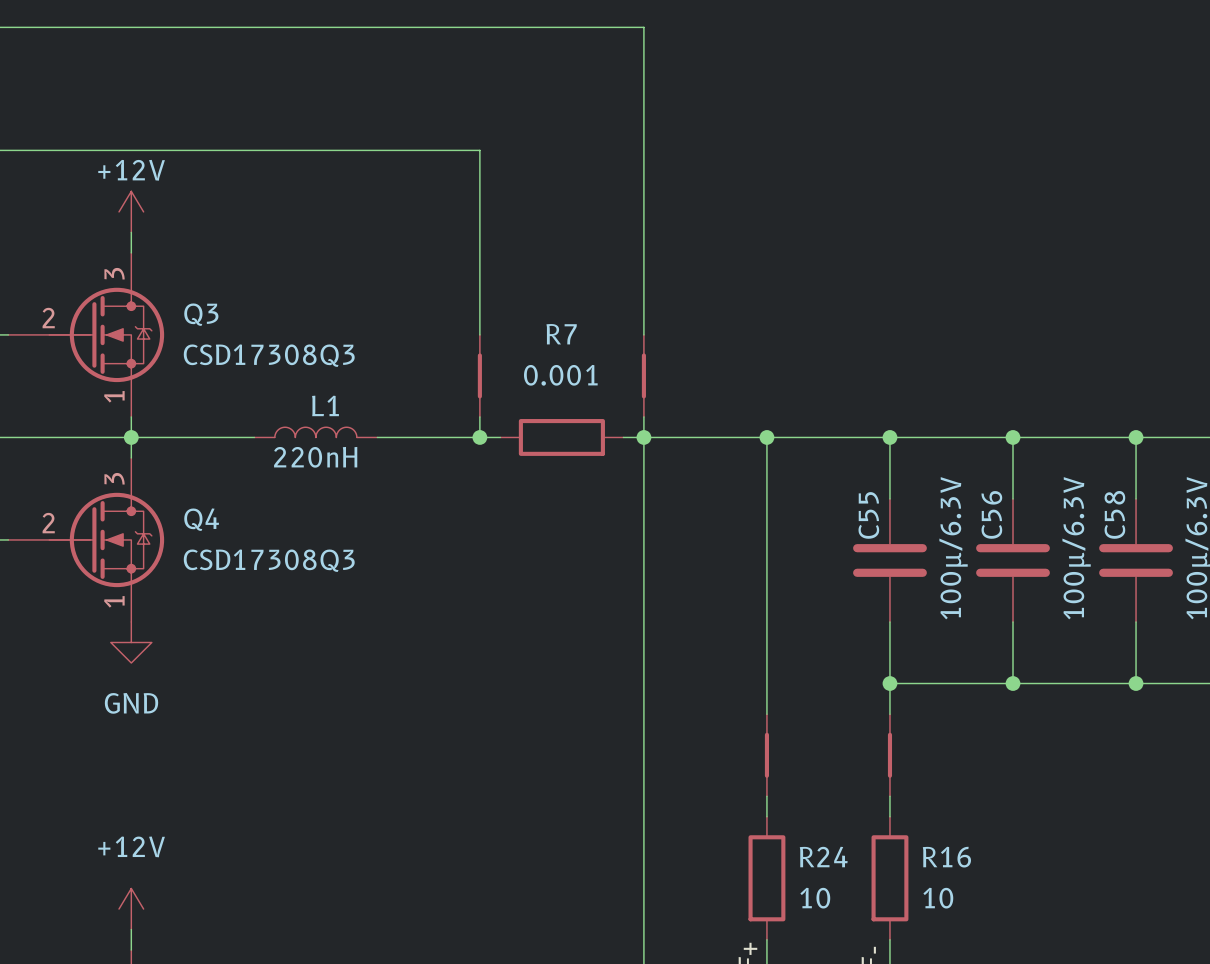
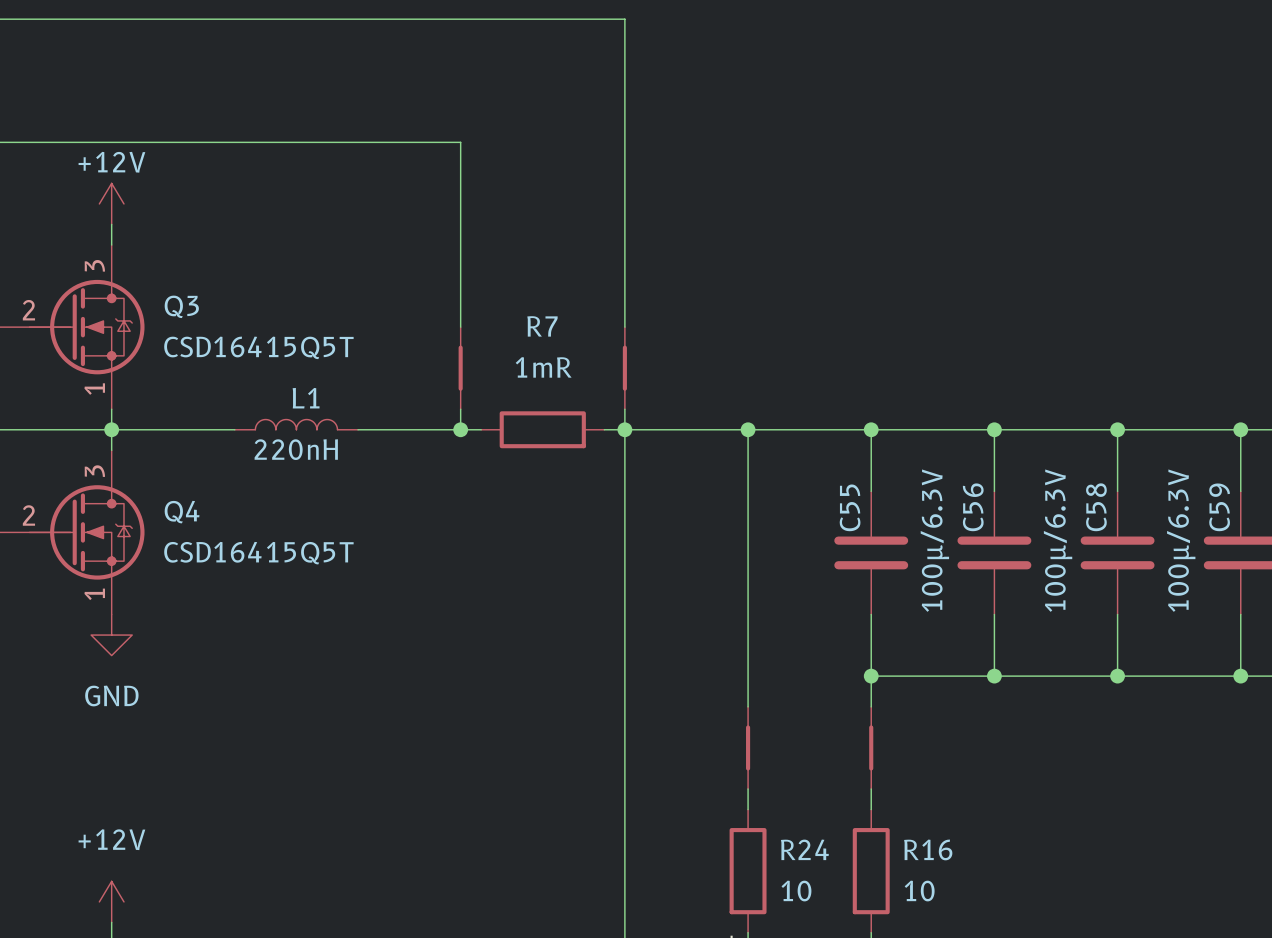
Q3 value: CSD17308Q3 (269, 355) -> CSD16415Q5T (258, 347)
R7 value: 0.001 (560, 375) -> 1mR (543, 367)
Q4 value: CSD17308Q3 (269, 560) -> CSD16415Q5T (258, 553)

